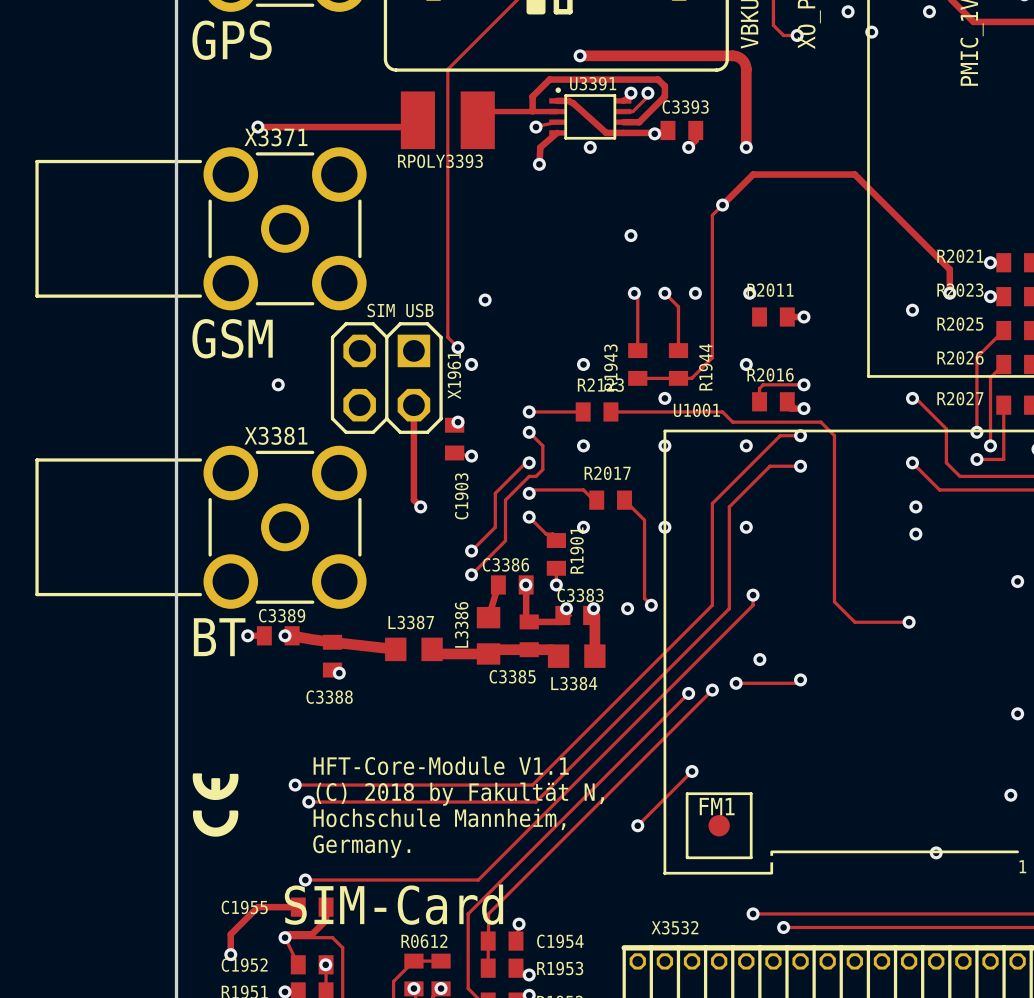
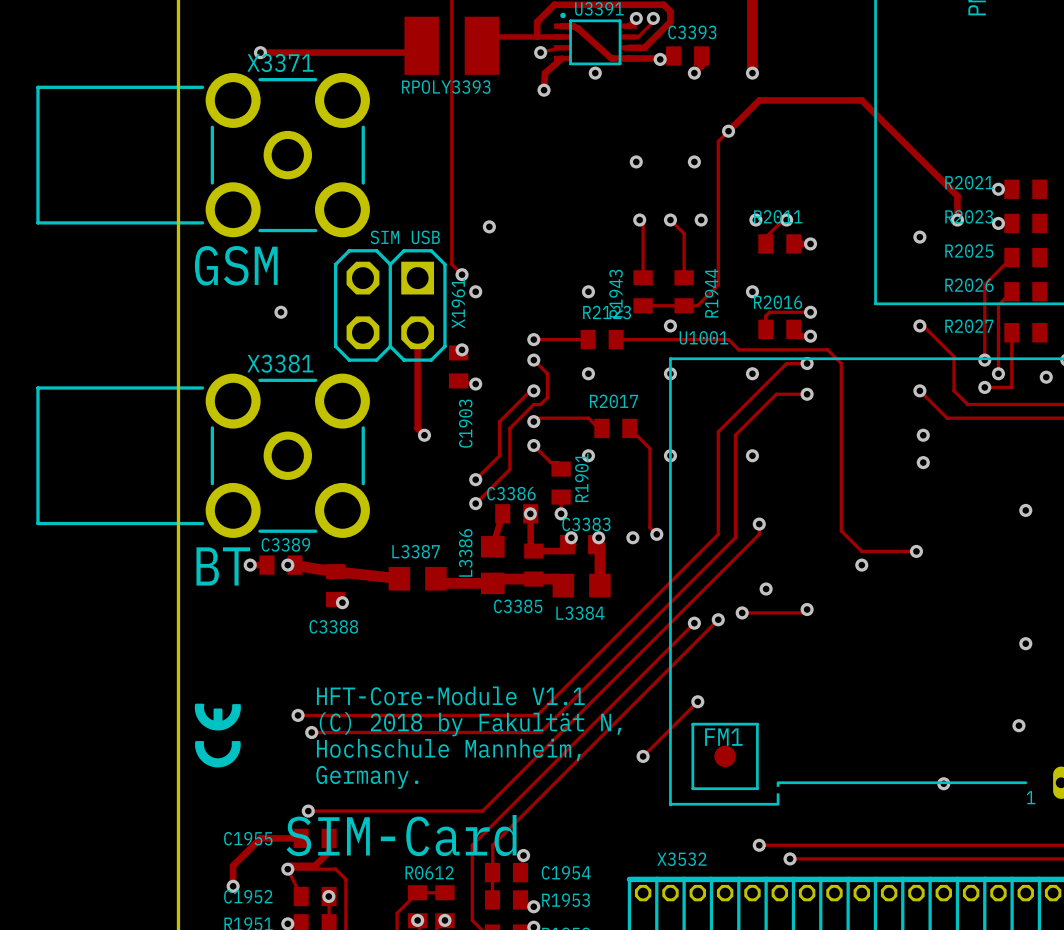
via: none -> (694, 161)
track: none -> (786, 220) (783, 220) (765, 237) (765, 243)
via: none -> (786, 220)
via: none -> (861, 565)

